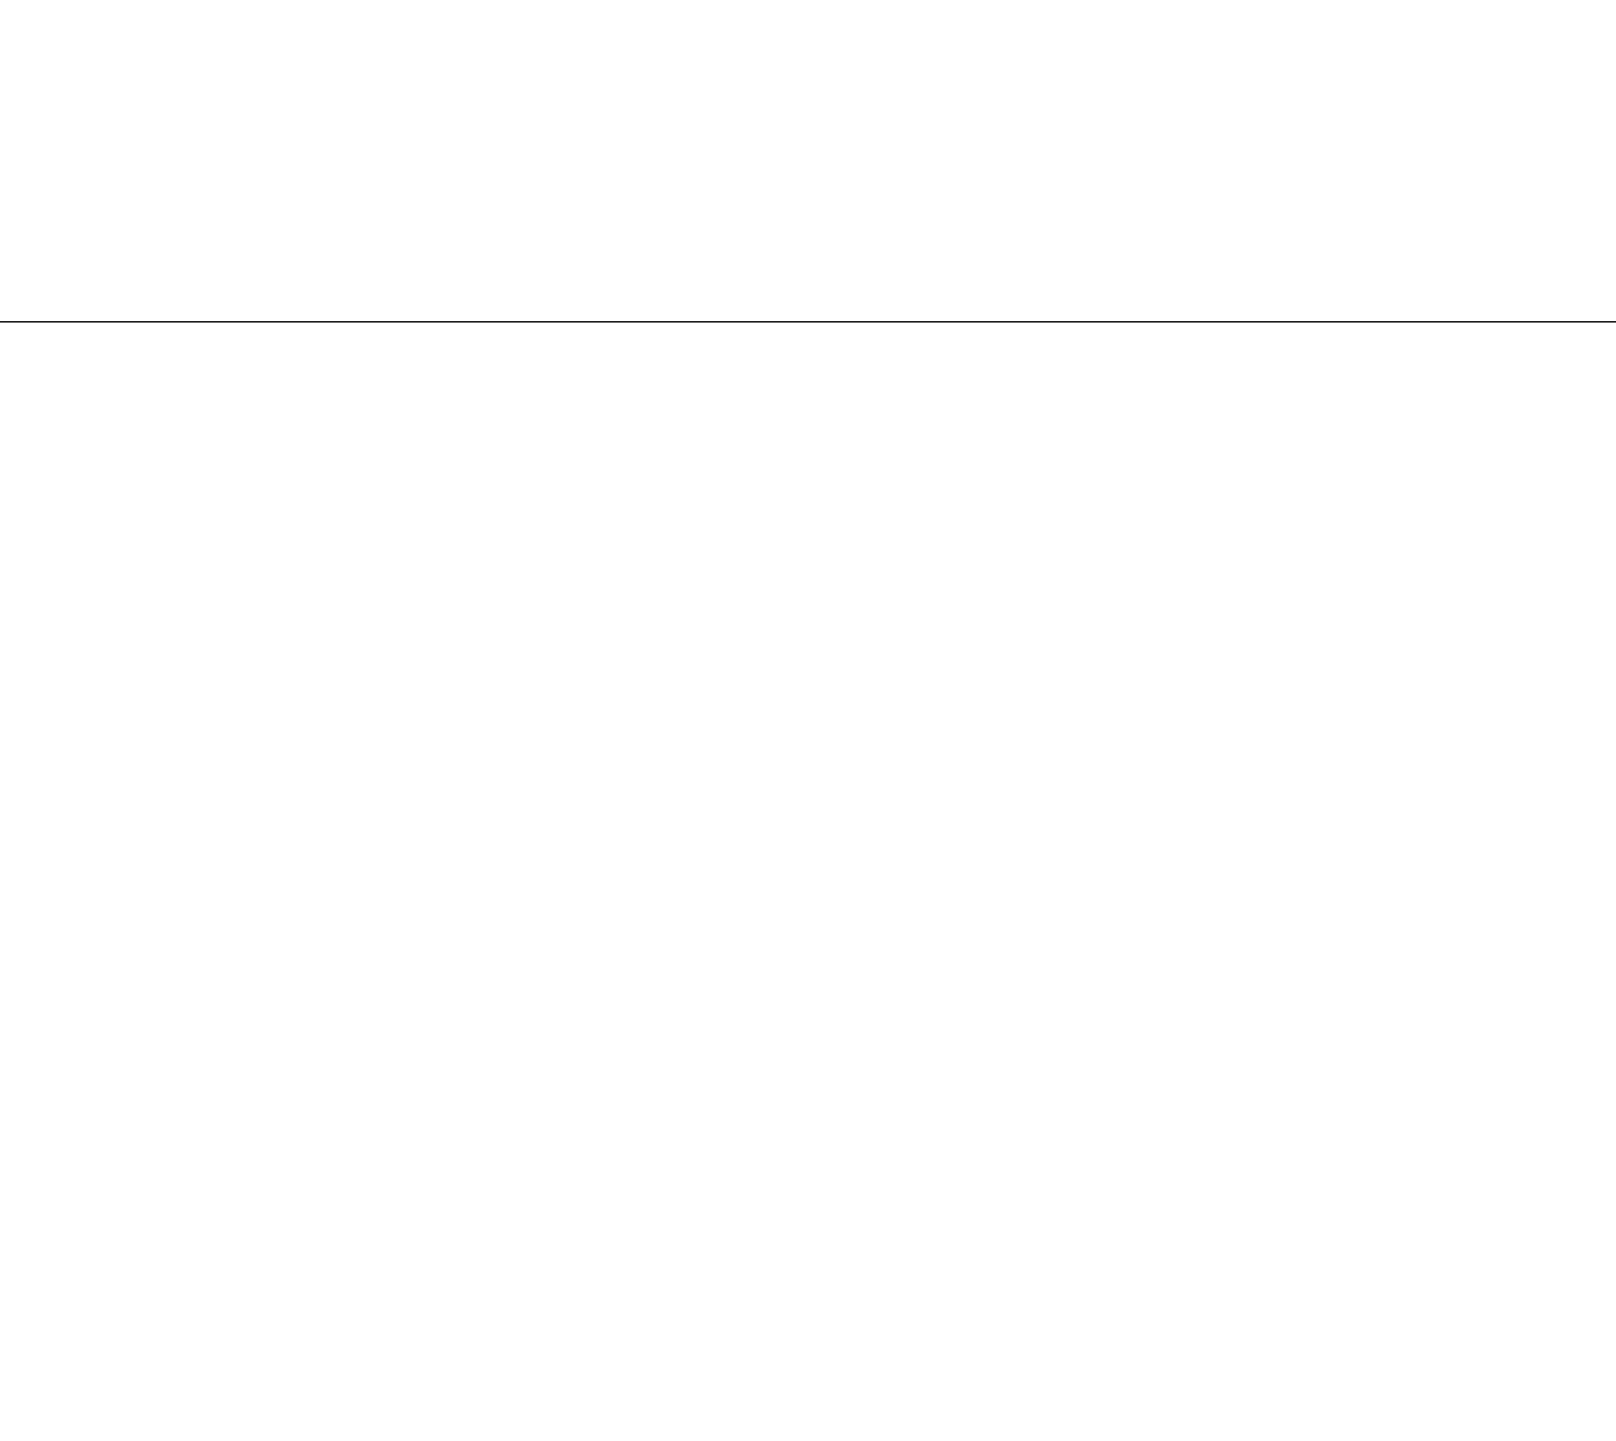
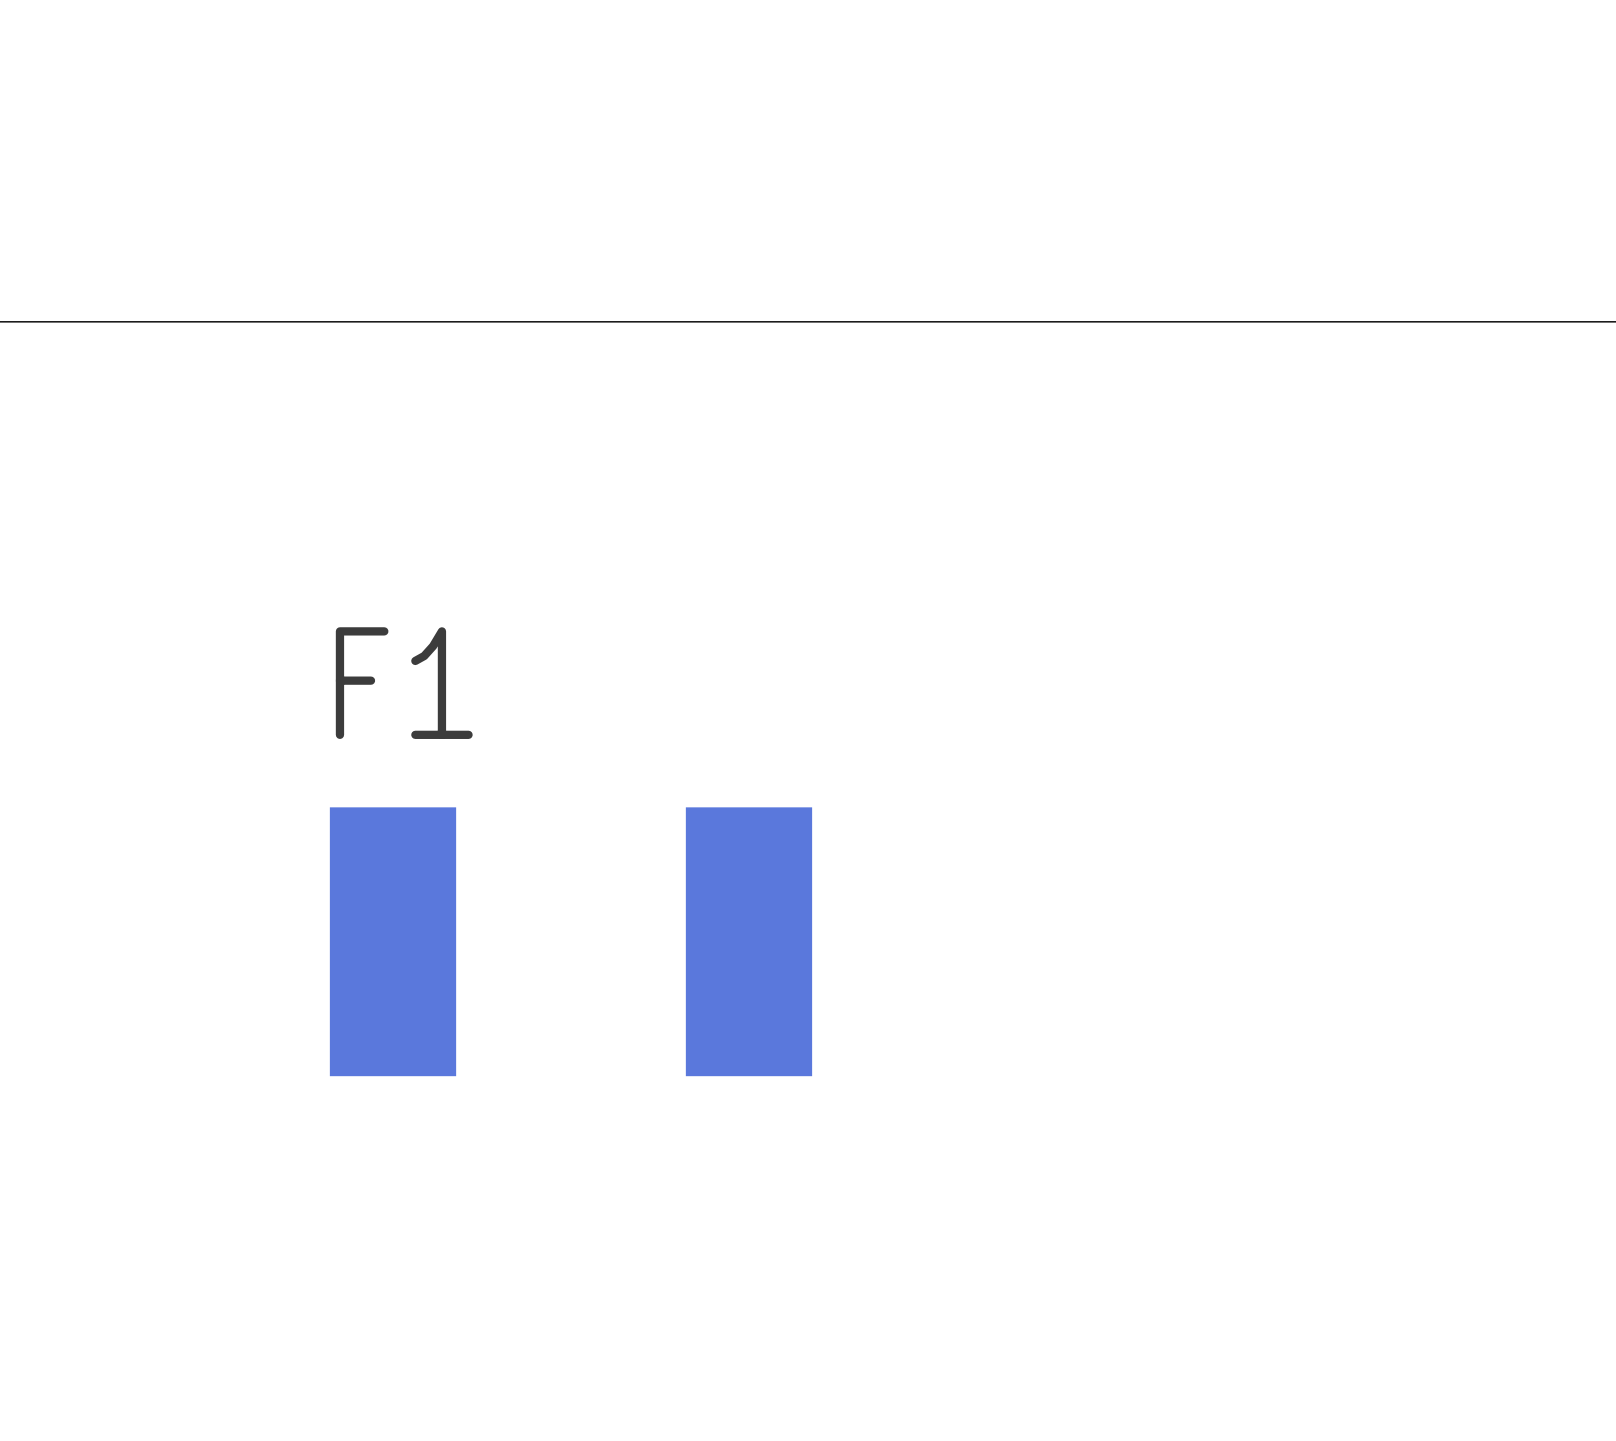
F1: none -> (570, 941)

